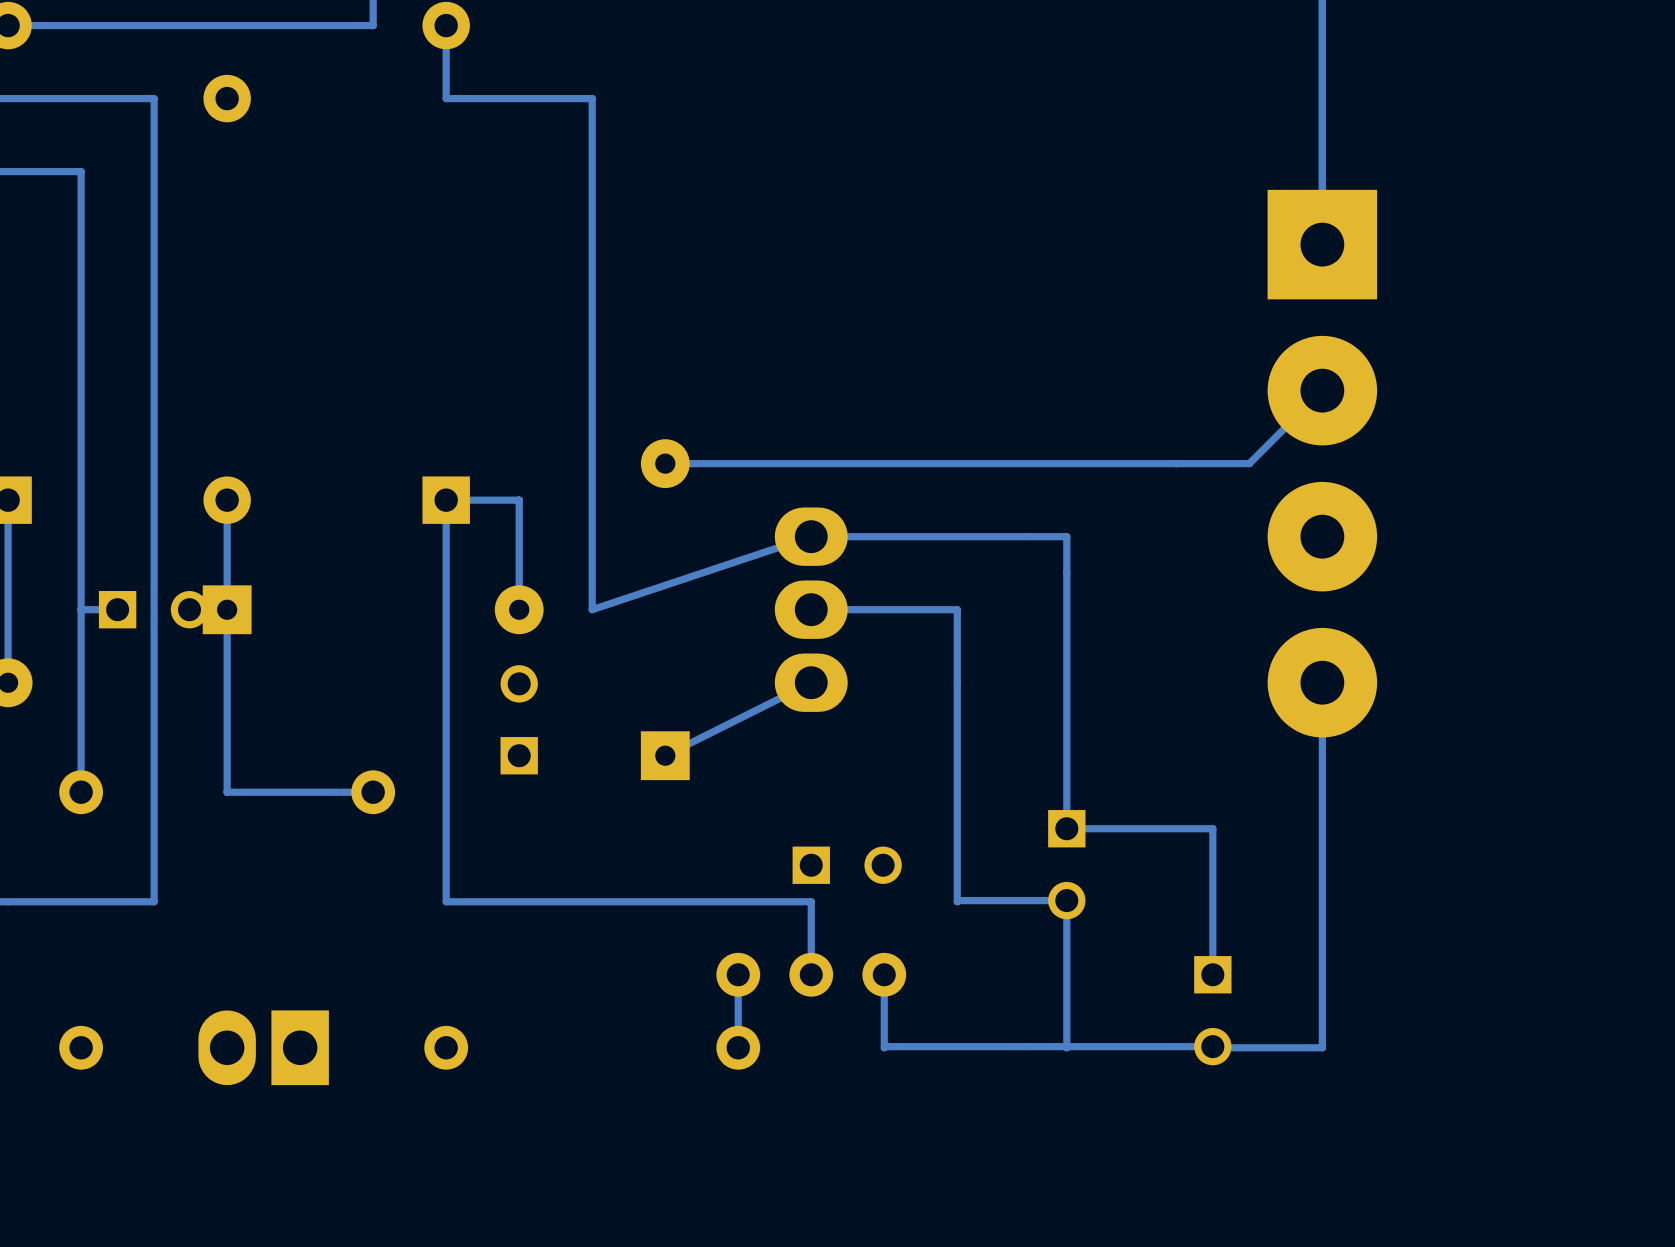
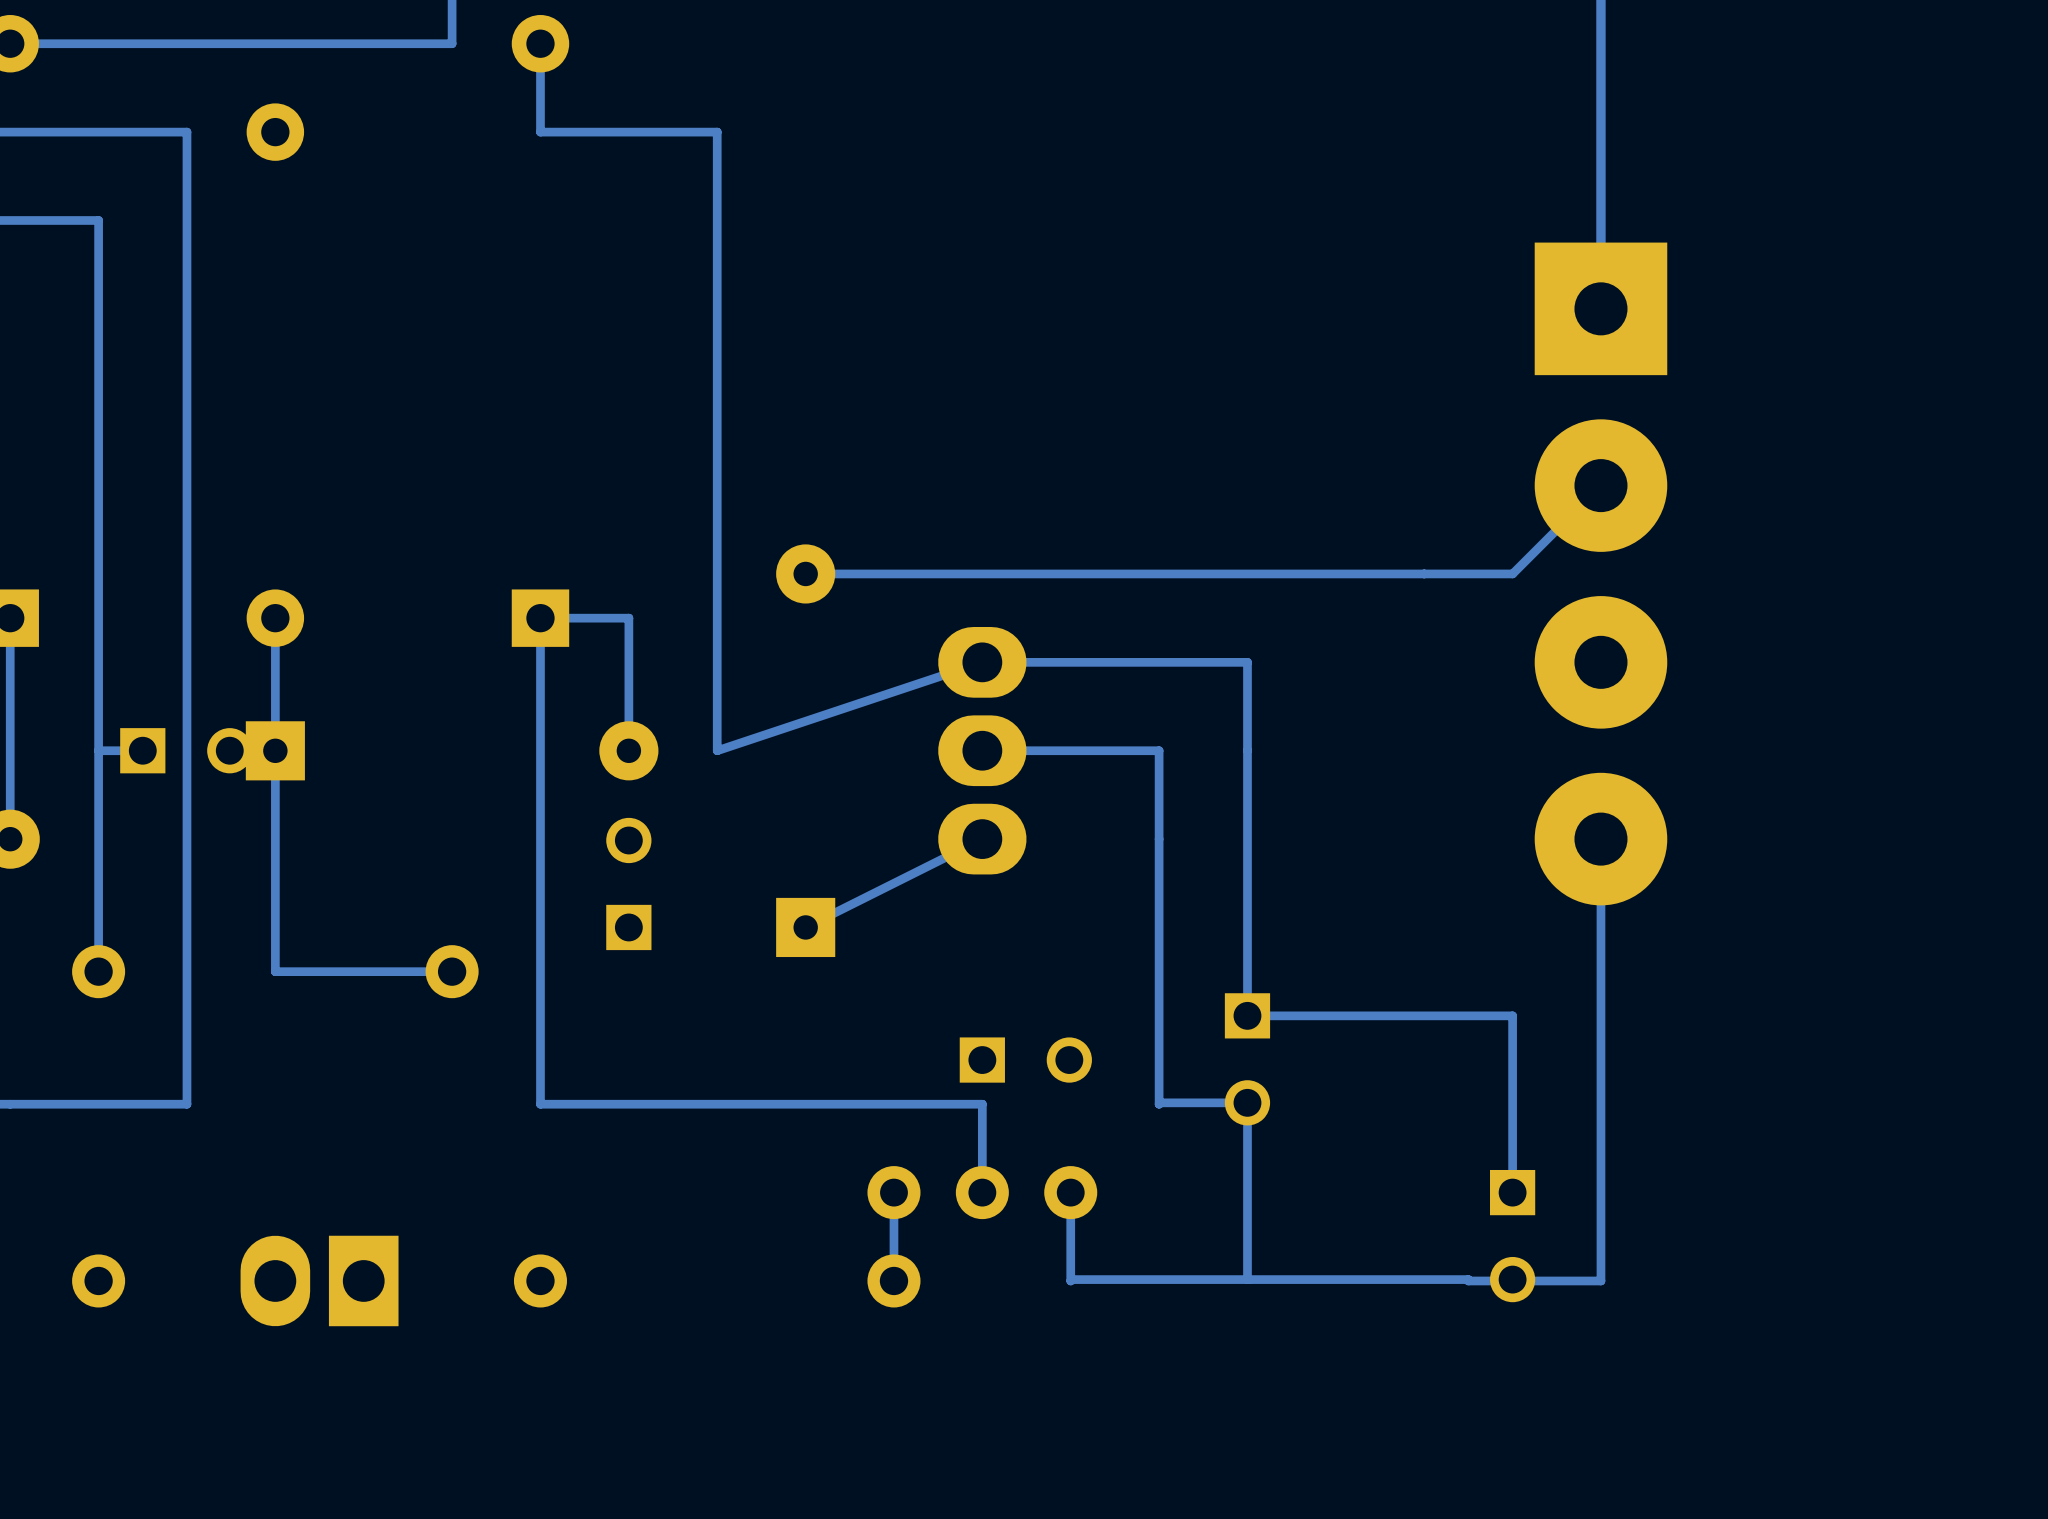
track: (1030, 536) (1066, 536) (1066, 828) -> (1247, 662) (1247, 1015) (1291, 1015)
track: (1212, 828) (1212, 974) -> (1468, 1015) (1512, 1015) (1512, 1192)
part position: (1066, 864) -> (1247, 1059)
track: (1030, 900) (1066, 900) (1066, 1047) -> (1247, 1102) (1248, 1279)
part position: (1212, 1010) -> (1512, 1236)

